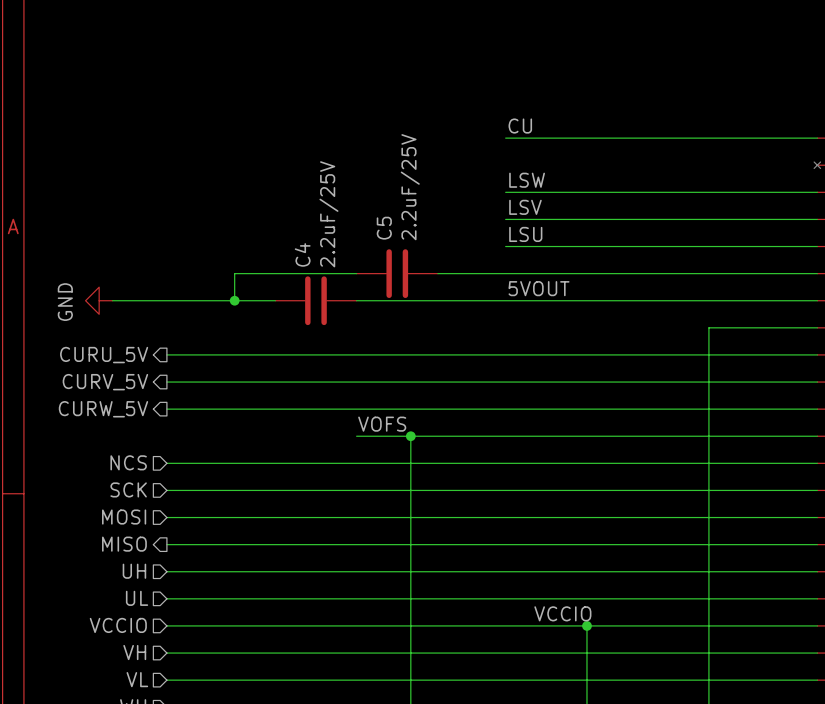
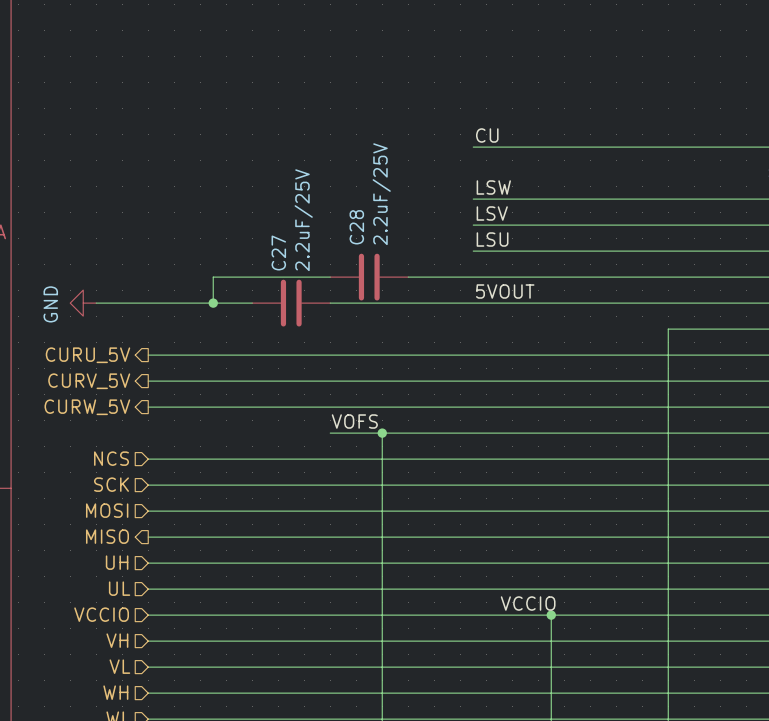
C5 name: C5 (384, 228) -> C28 (356, 227)
C4 name: C4 (302, 254) -> C27 (278, 252)

